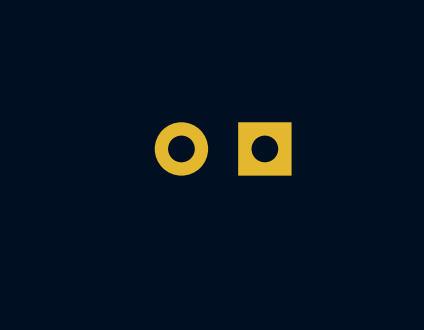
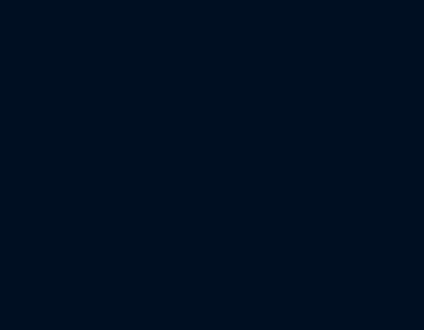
part: (223, 148) -> none

